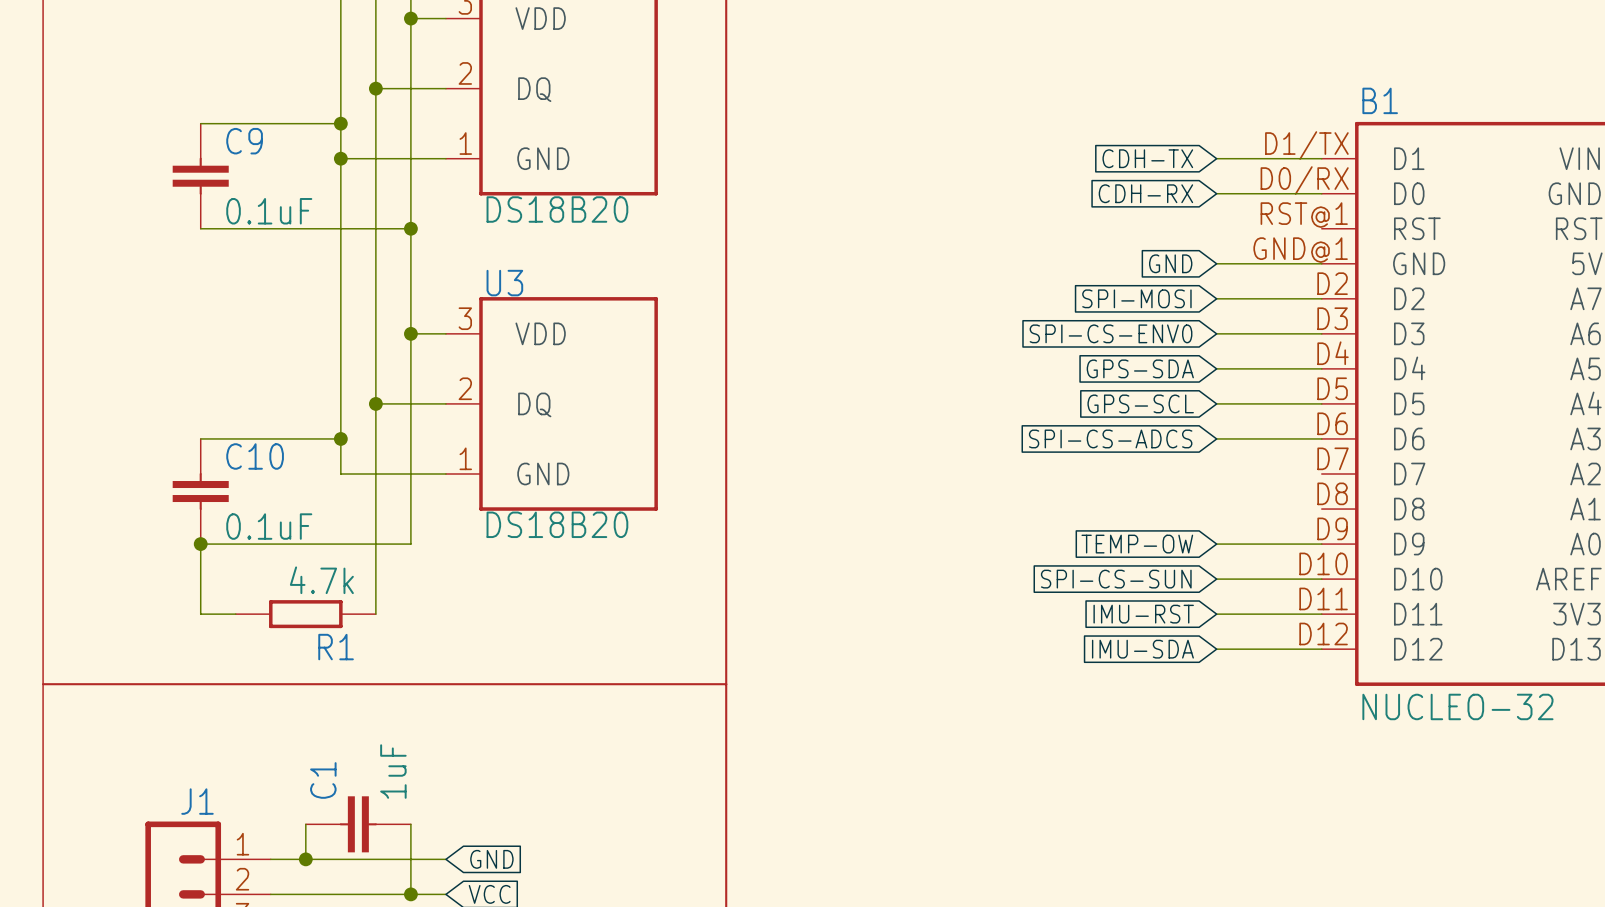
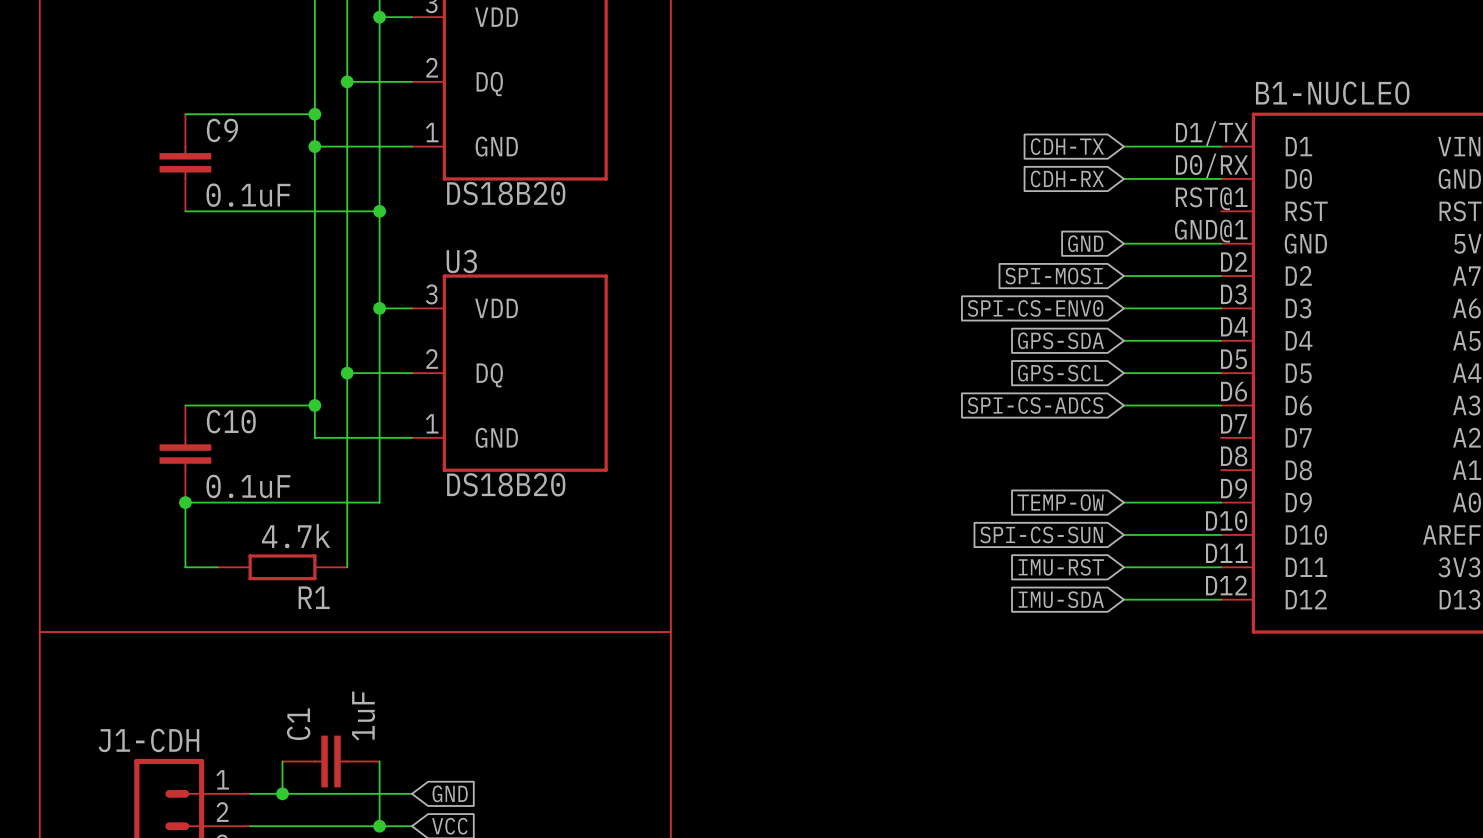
B1 name: B1 (1380, 100) -> B1-NUCLEO (1332, 93)
B1 value: NUCLEO-32 (1457, 706) -> none
J1 name: J1 (197, 801) -> J1-CDH (148, 740)

